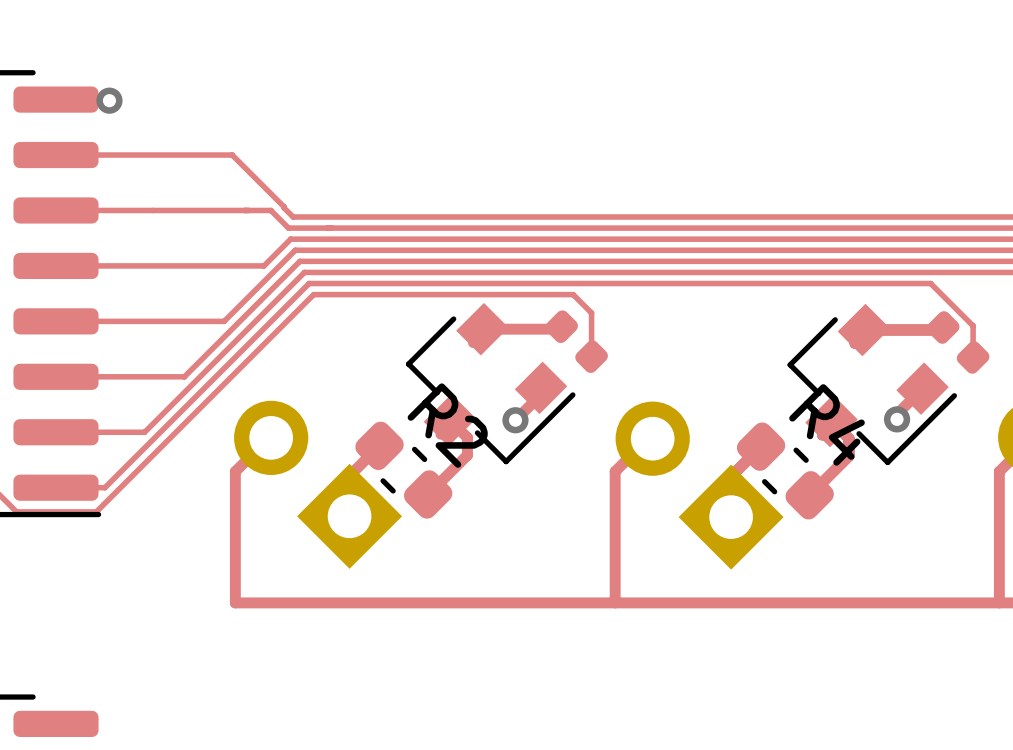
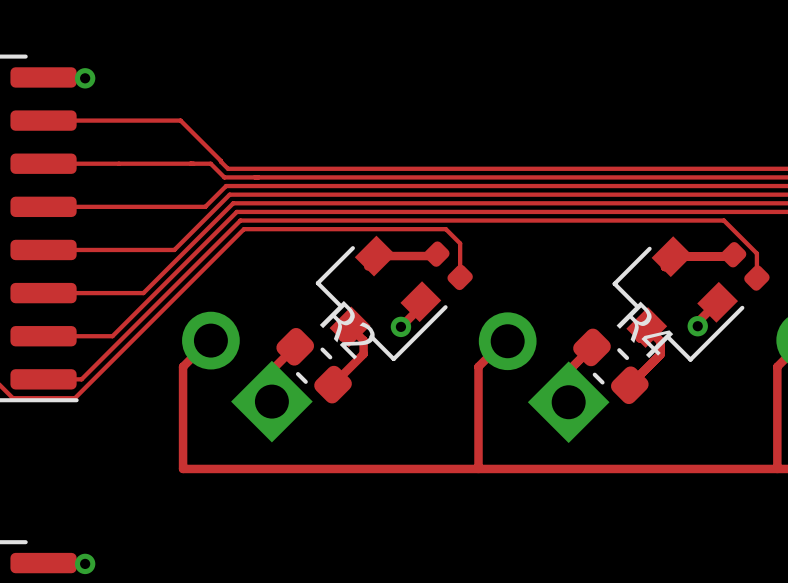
via: none -> (85, 563)

